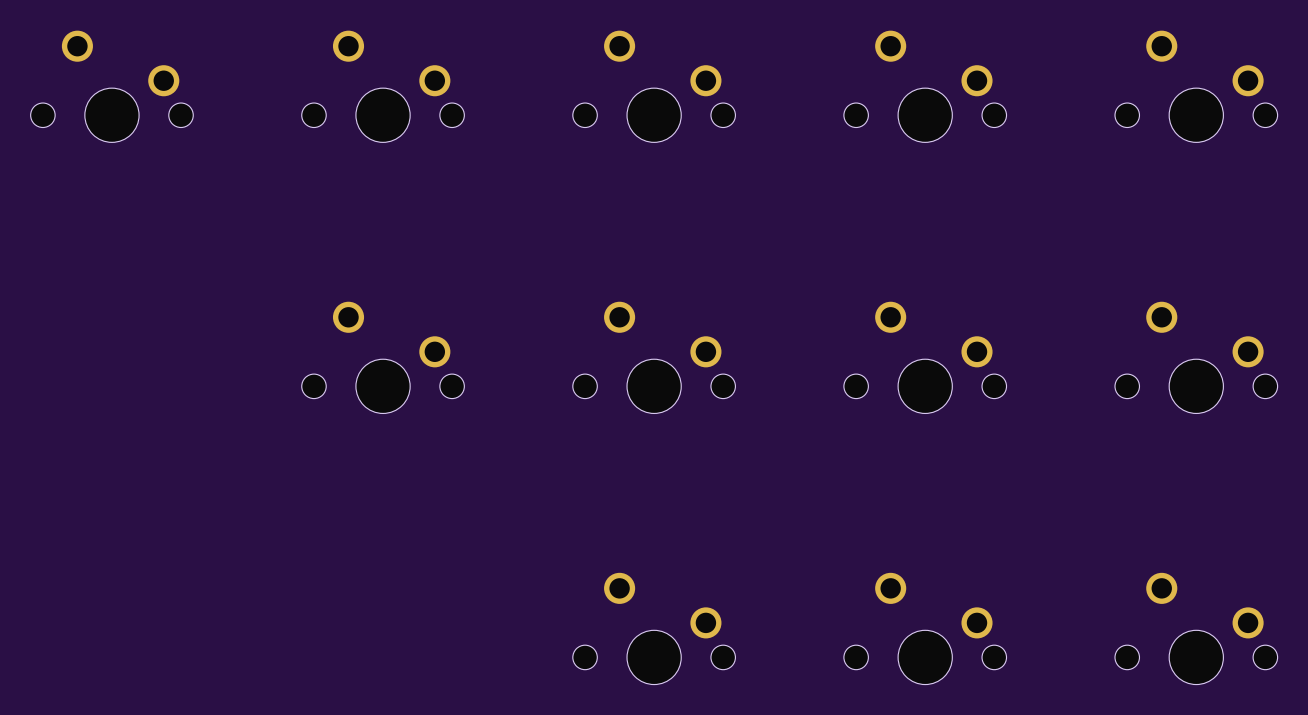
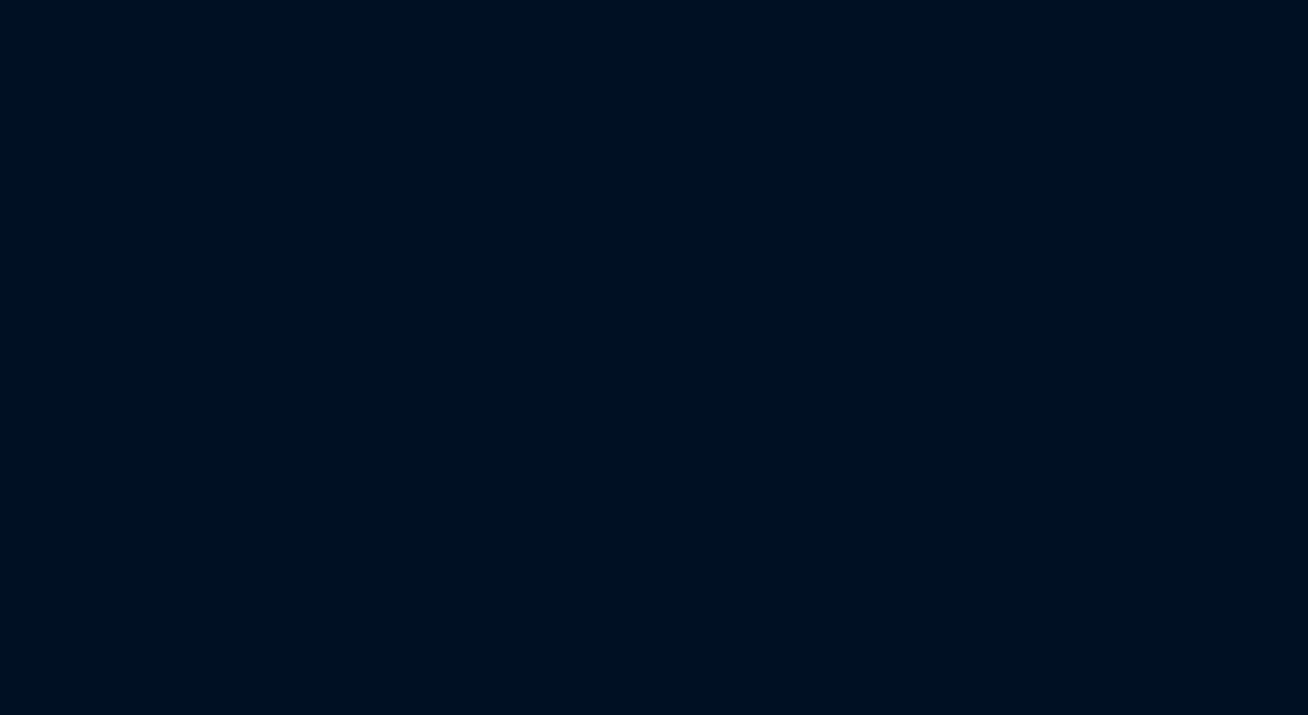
part: (111, 86) -> none
part: (383, 86) -> none
part: (654, 86) -> none
part: (925, 86) -> none
part: (1196, 86) -> none
part: (383, 357) -> none
part: (654, 357) -> none
part: (925, 357) -> none
part: (1196, 357) -> none
part: (654, 628) -> none
part: (925, 628) -> none
part: (1196, 628) -> none

